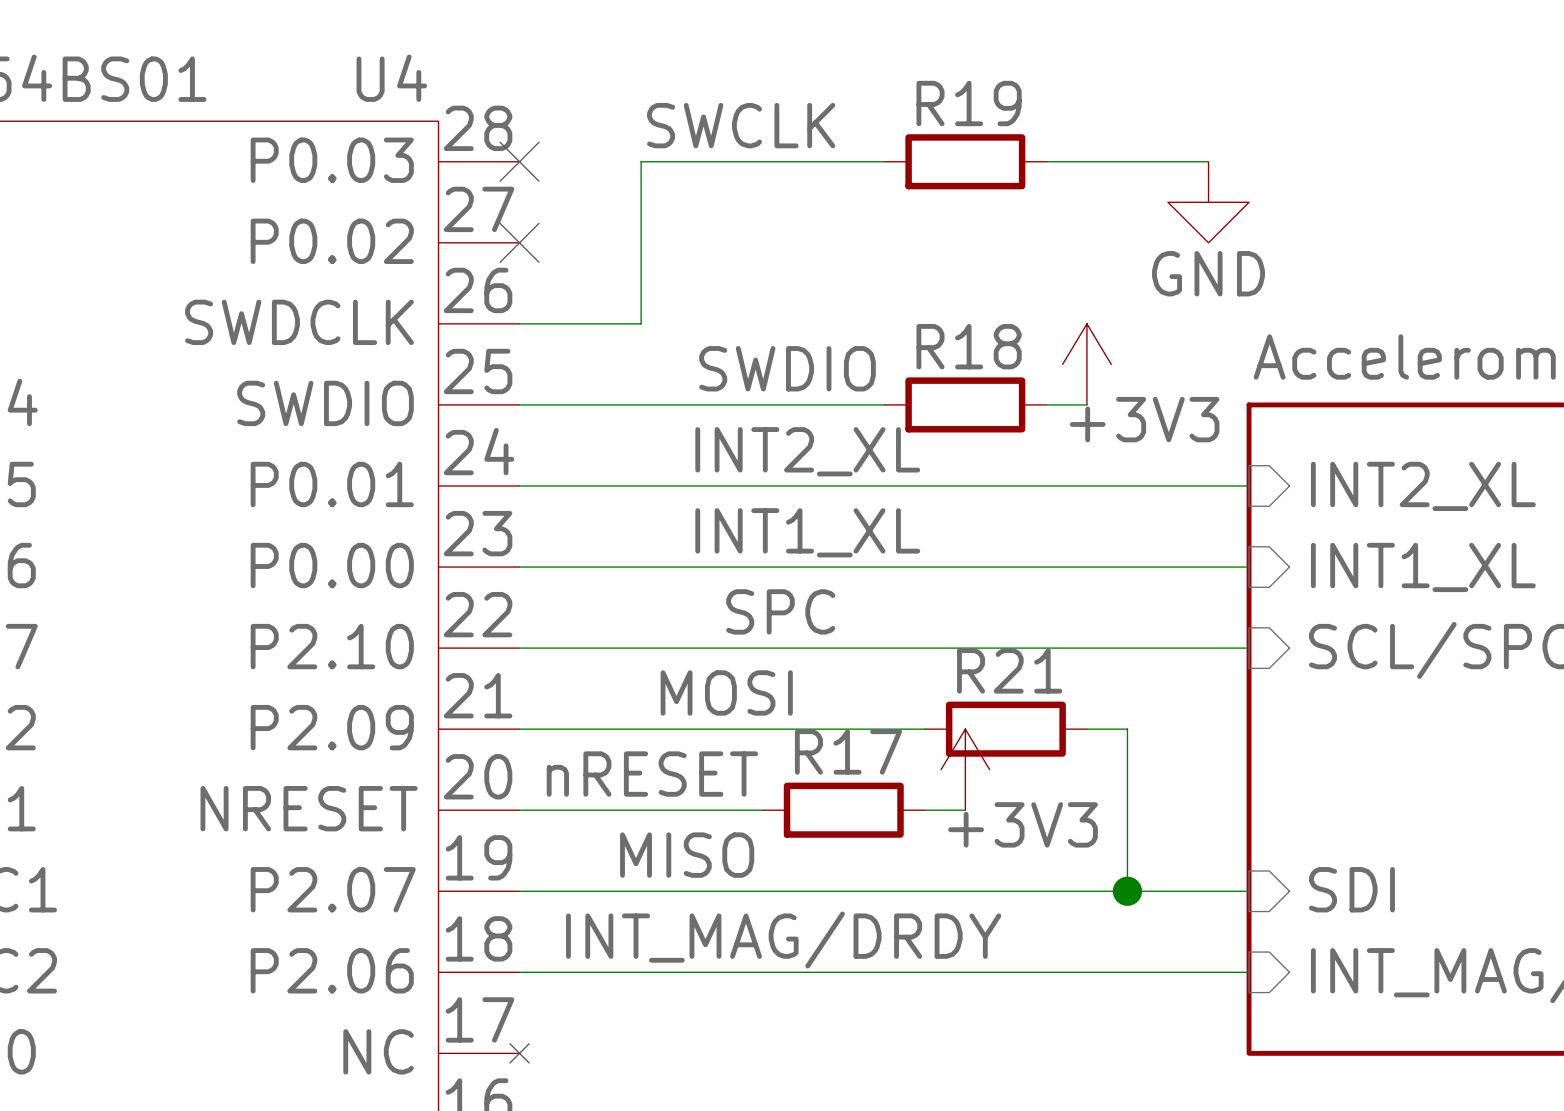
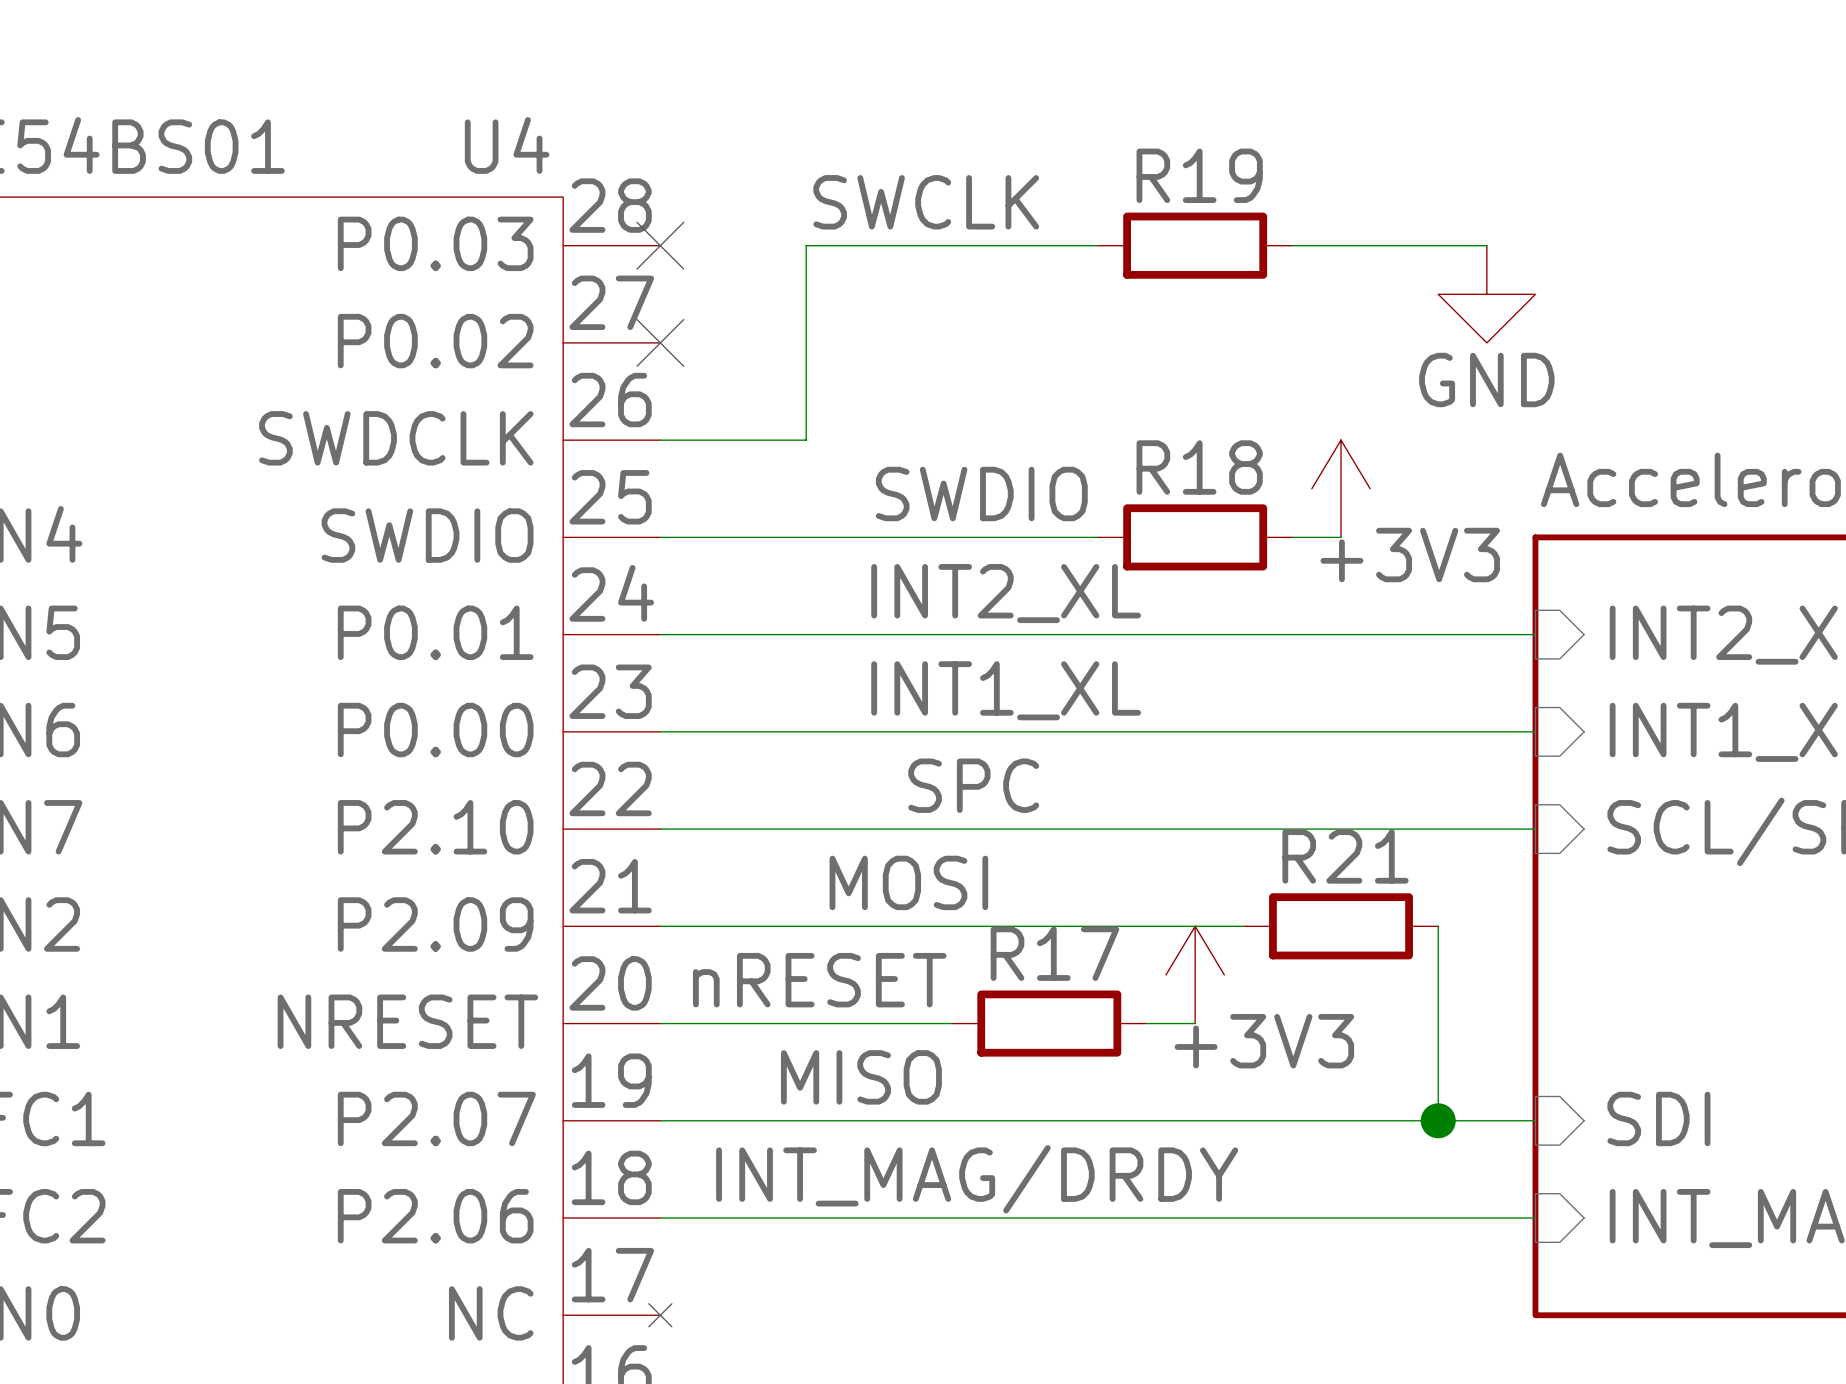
wire: none -> (1146, 926) (1243, 926)
R21 position: (1005, 729) -> (1341, 926)
wire: (1086, 729) (1127, 729) (1127, 891) -> none
wire: none -> (1438, 926) (1438, 1120)
junction position: (1127, 891) -> (1438, 1120)

